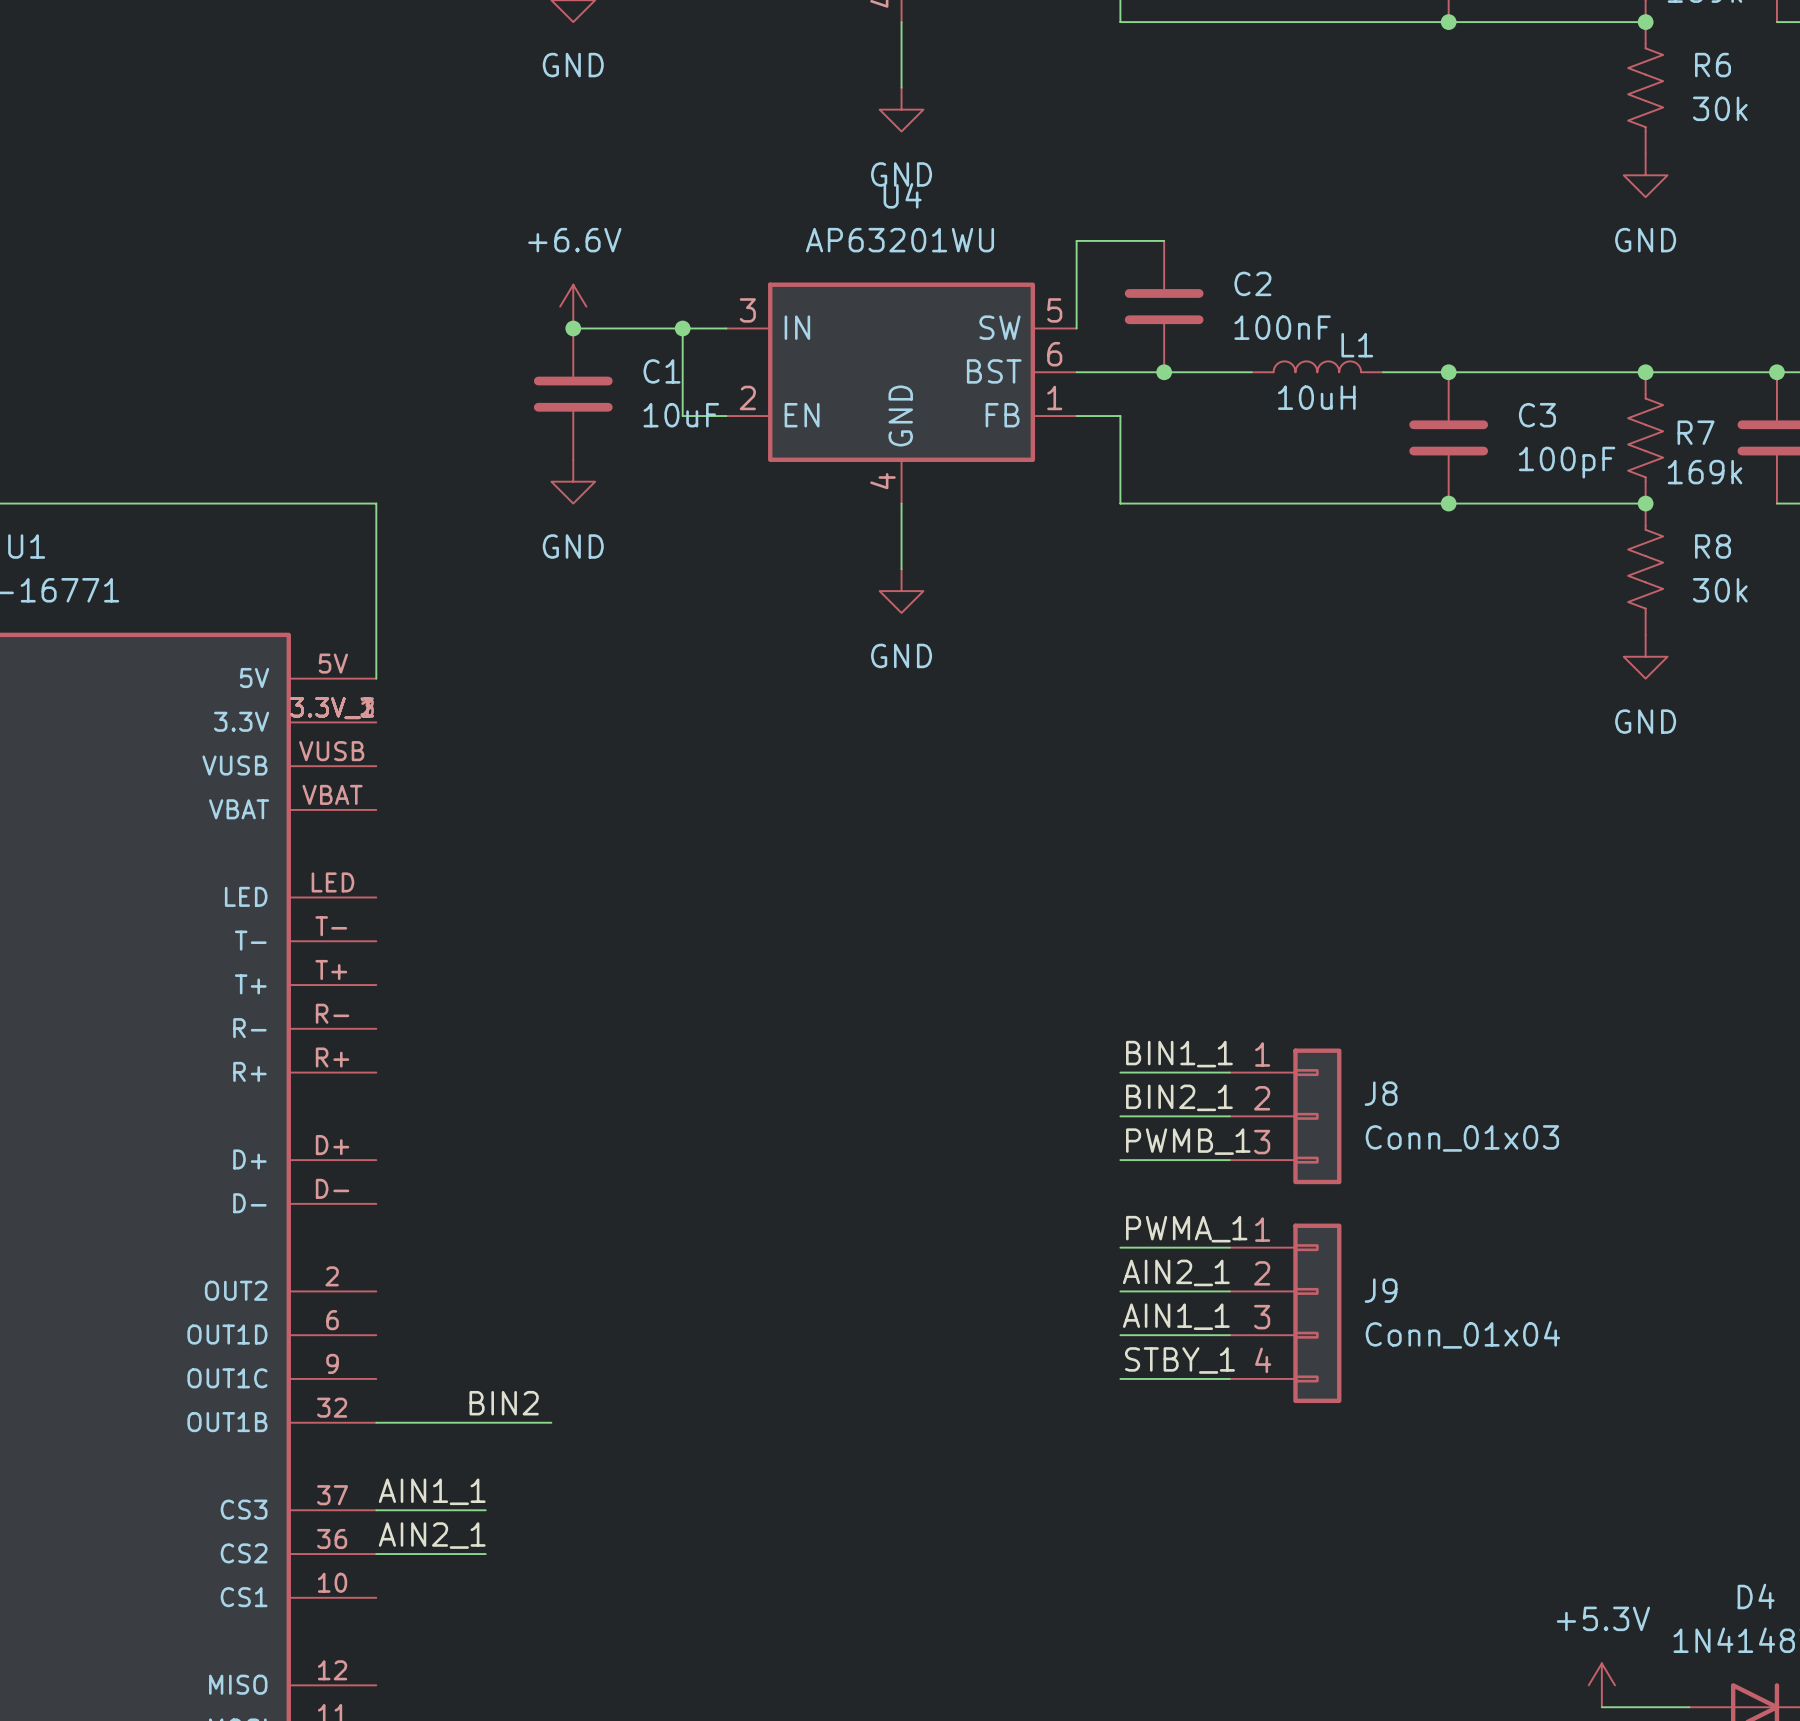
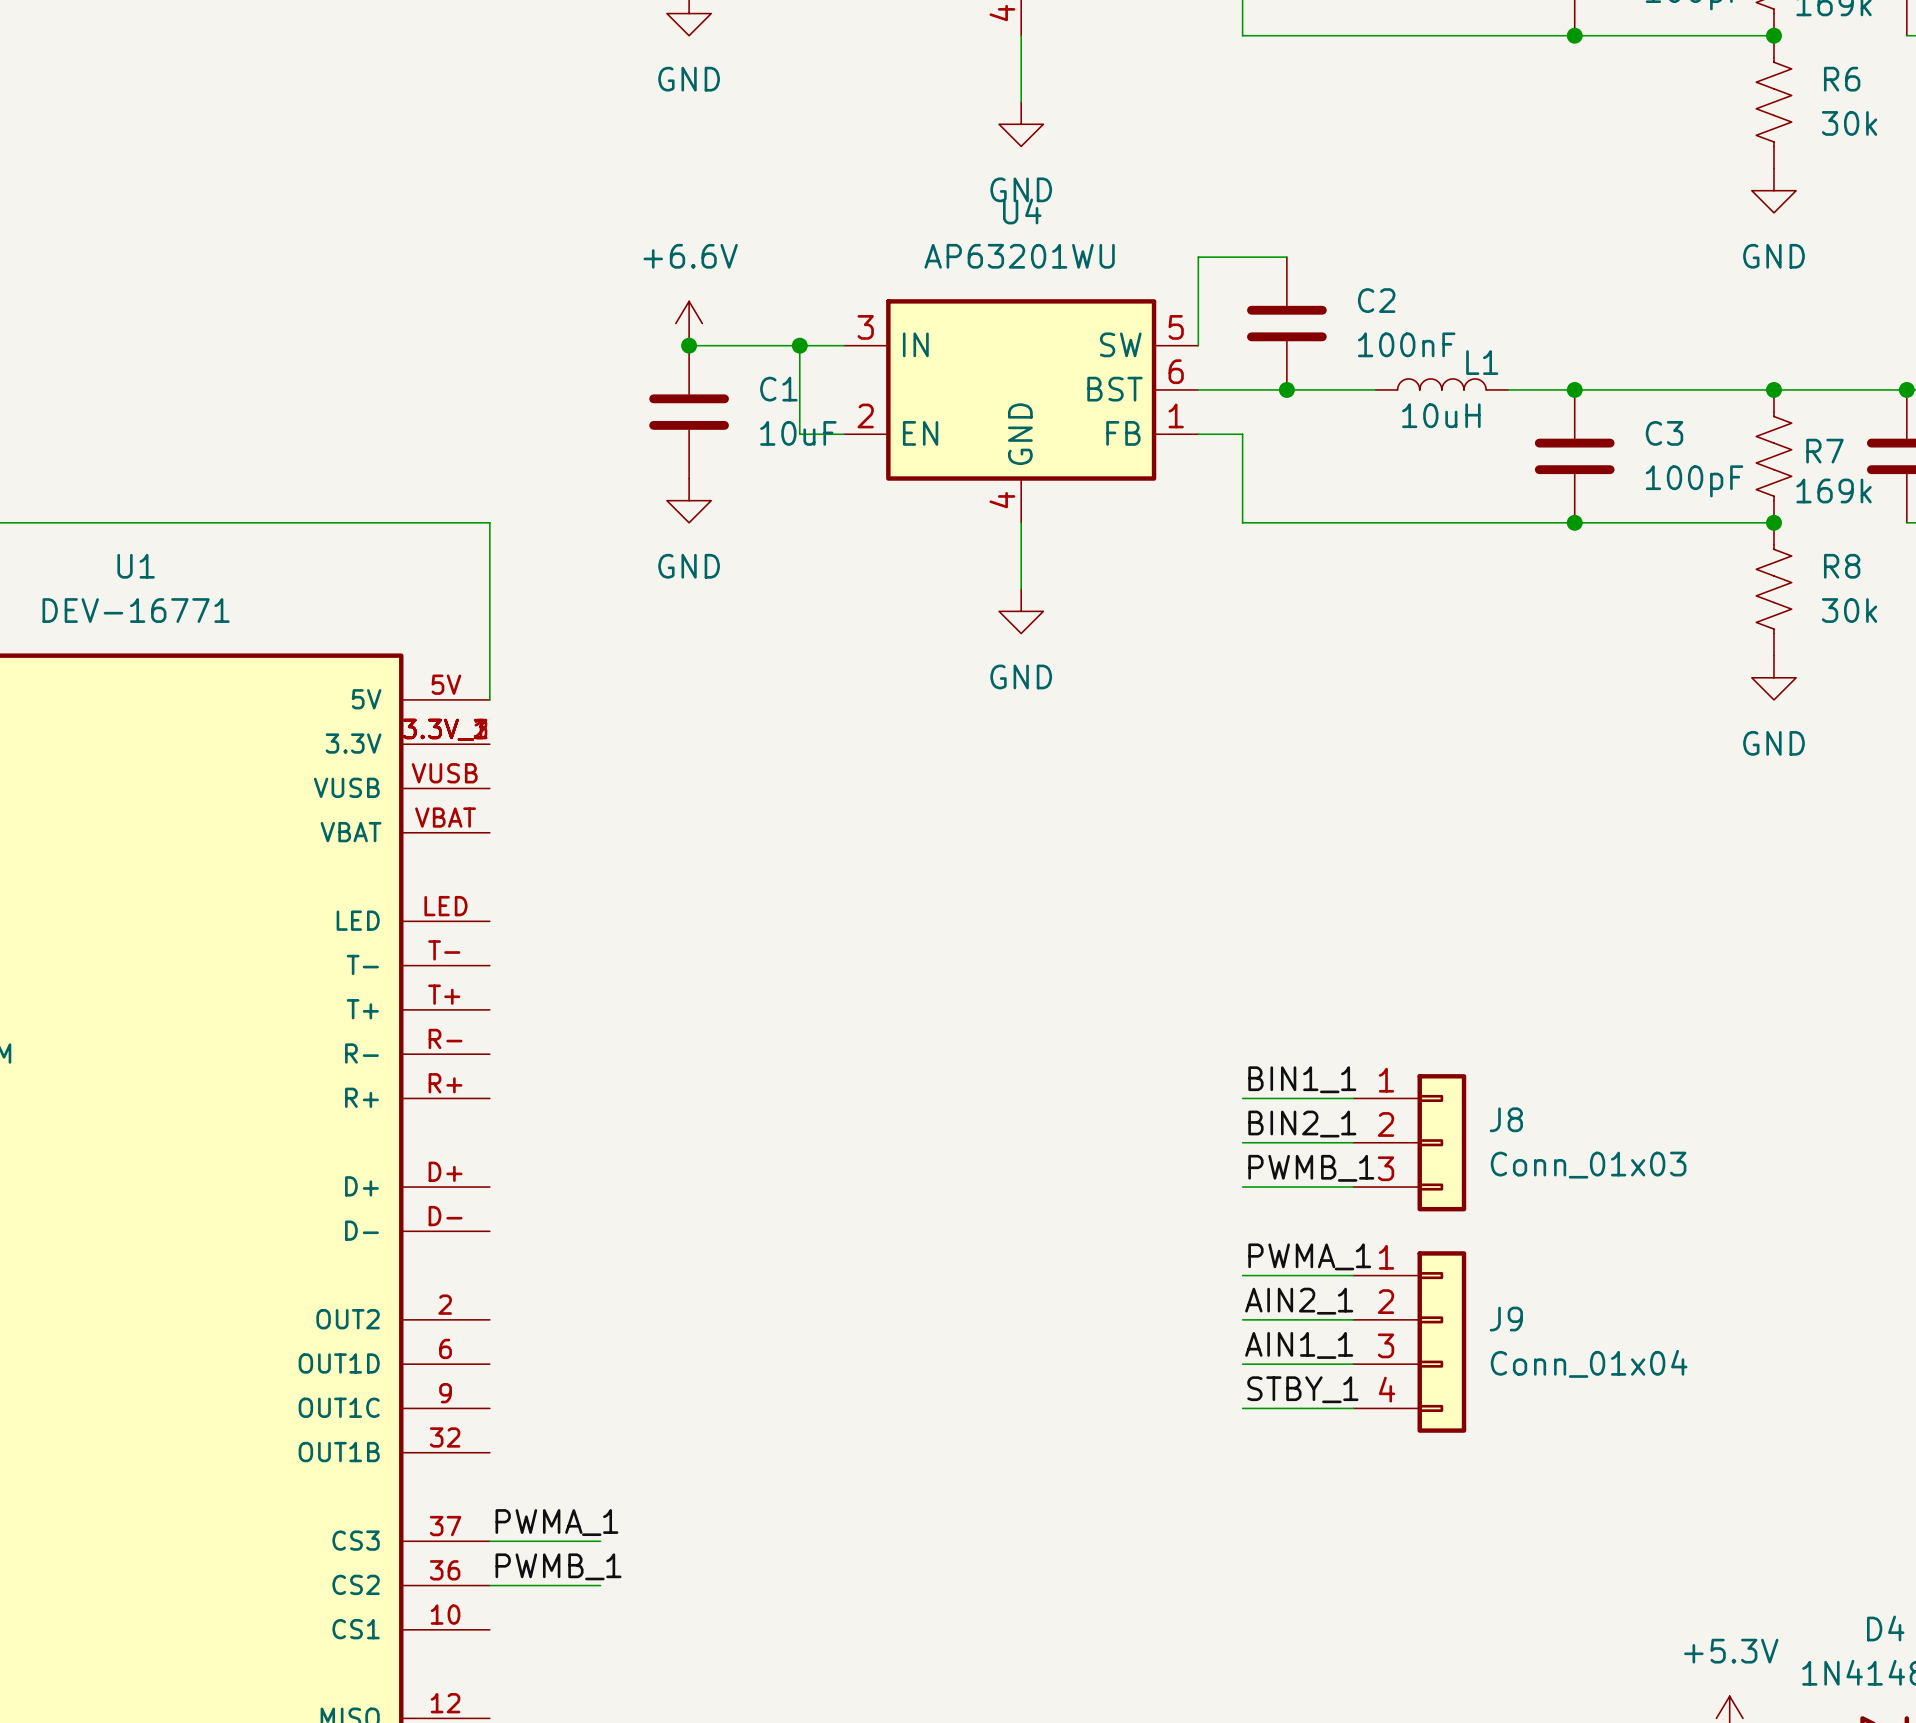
label: BIN2 (504, 1403) -> none
wire: (376, 1422) (551, 1422) -> none
label: AIN1_1 (432, 1491) -> PWMA_1 (556, 1522)
label: AIN2_1 (432, 1535) -> PWMB_1 (558, 1566)

